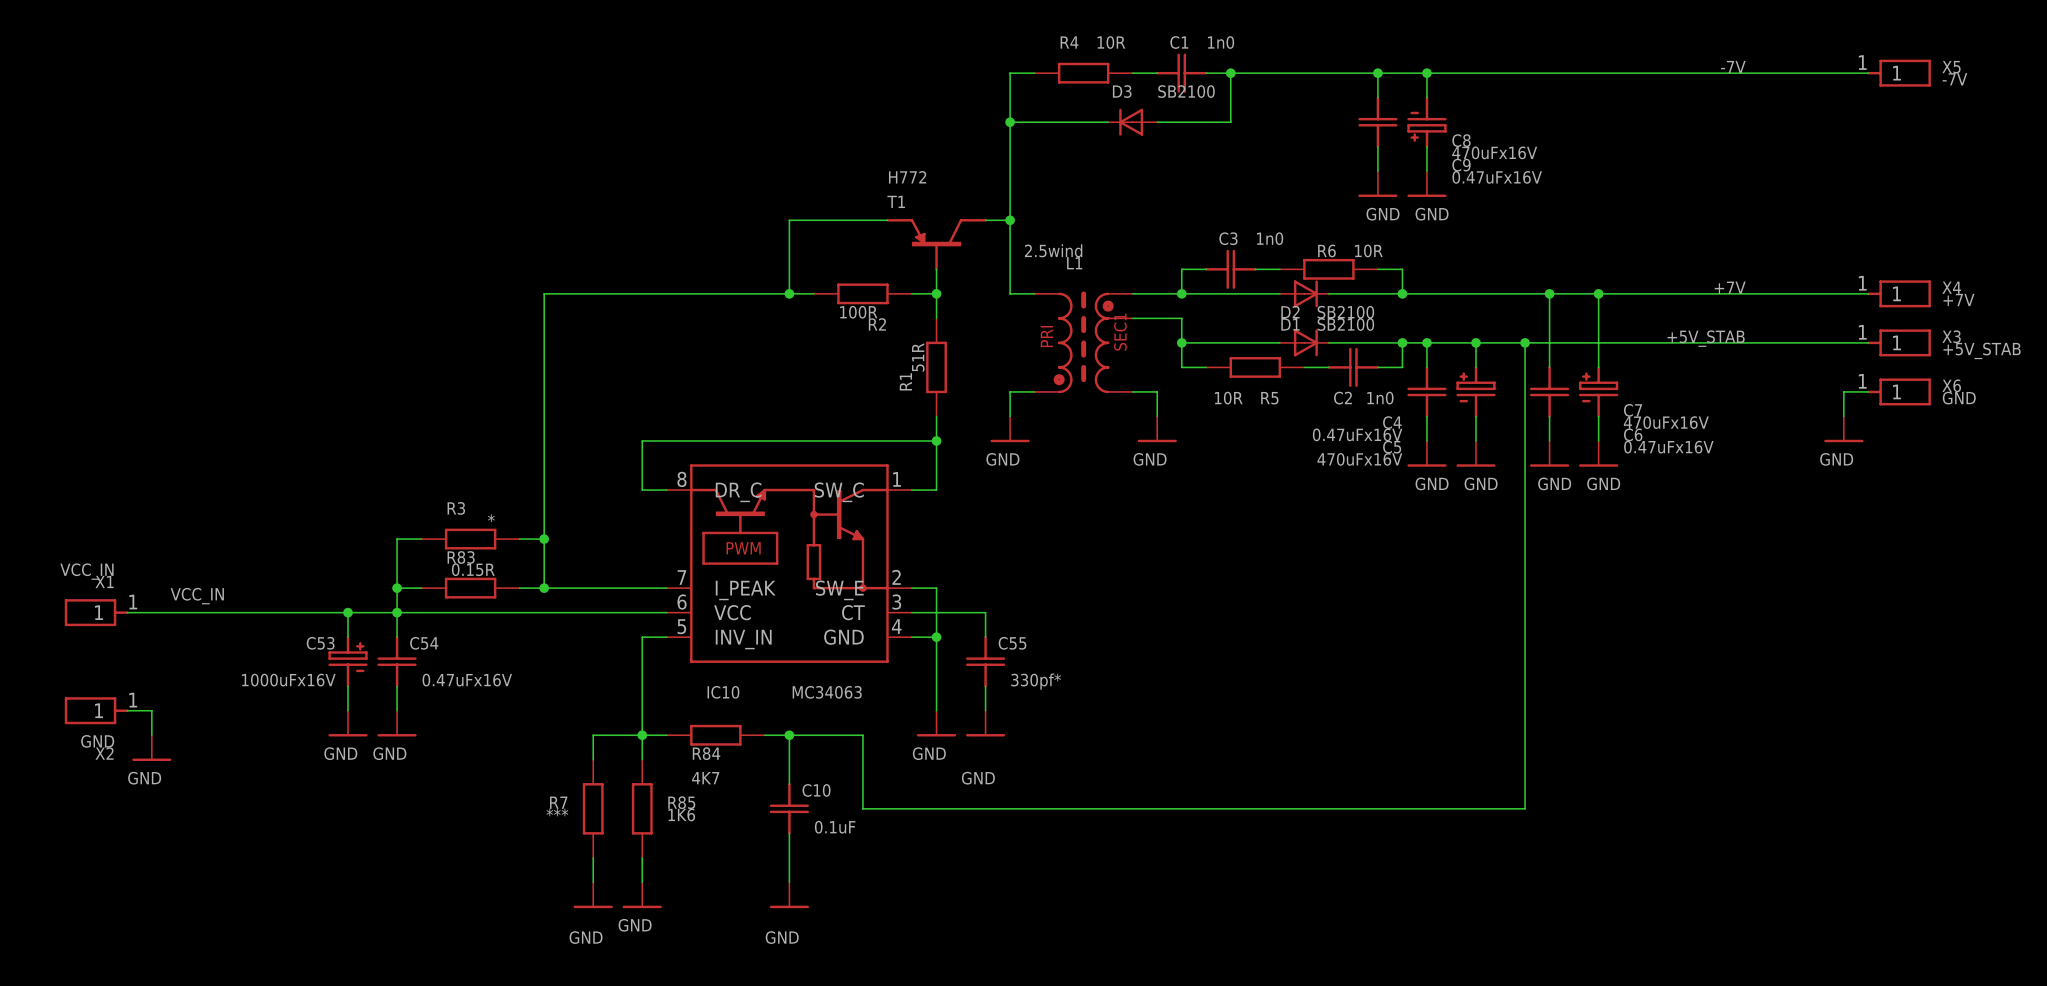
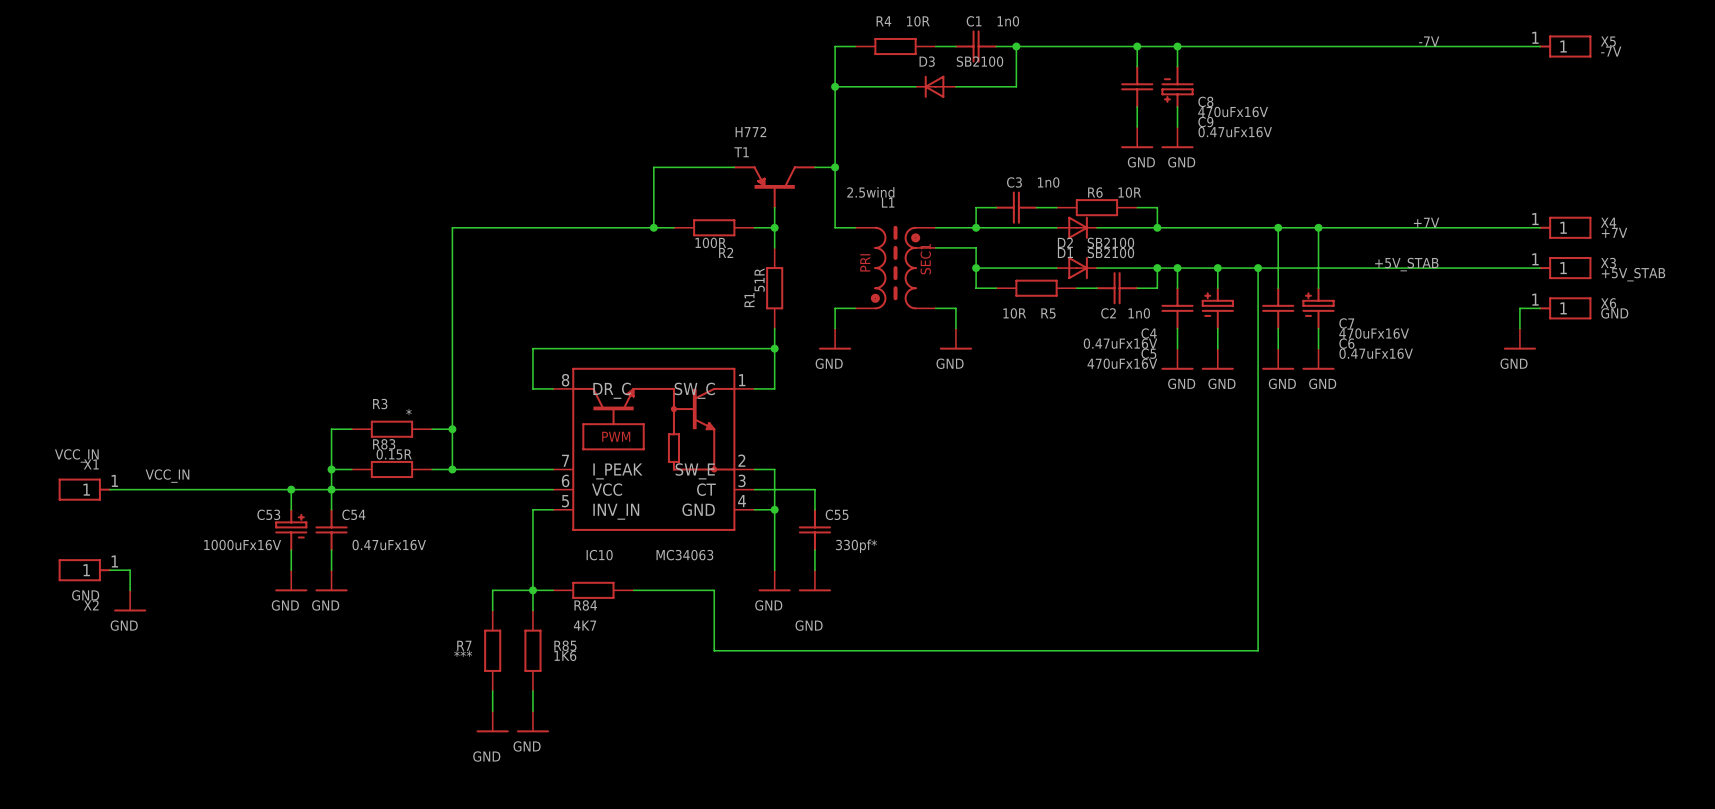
wire: (789, 735) (789, 784) -> none
junction: (789, 735) -> none
C10: 0.1uF (789, 808) -> none
wire: (789, 833) (789, 882) -> none
power symbol: GND (789, 895) -> none

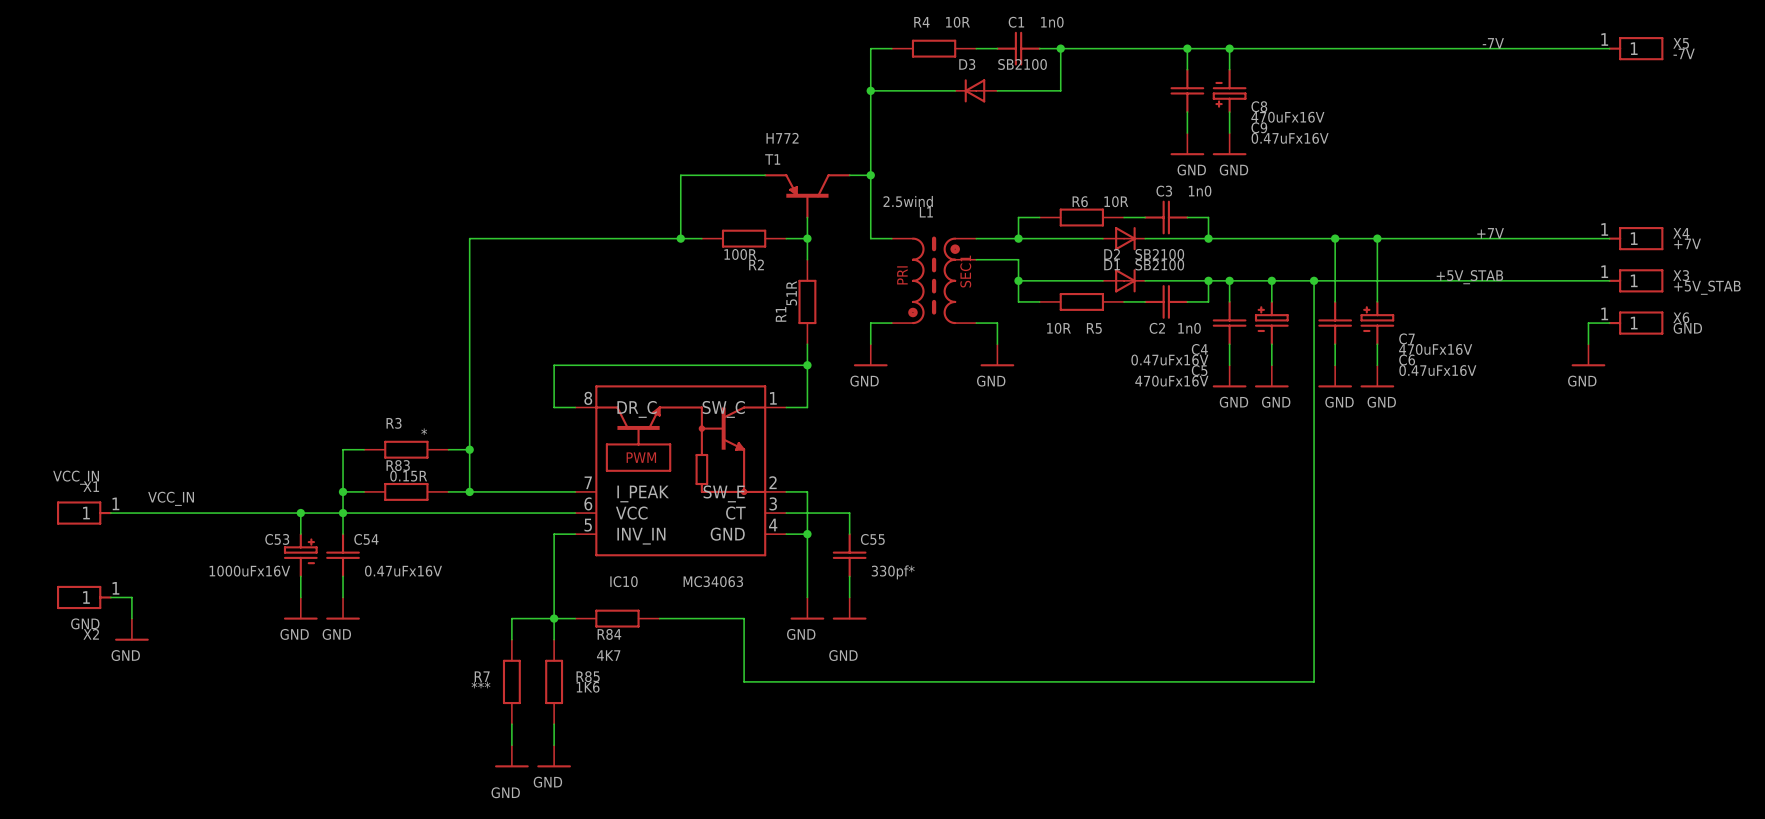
C3 position: (1016, 207) -> (1166, 217)
wire: (1036, 207) (1056, 207) -> (1124, 217) (1145, 217)
R6 position: (1096, 207) -> (1081, 217)

